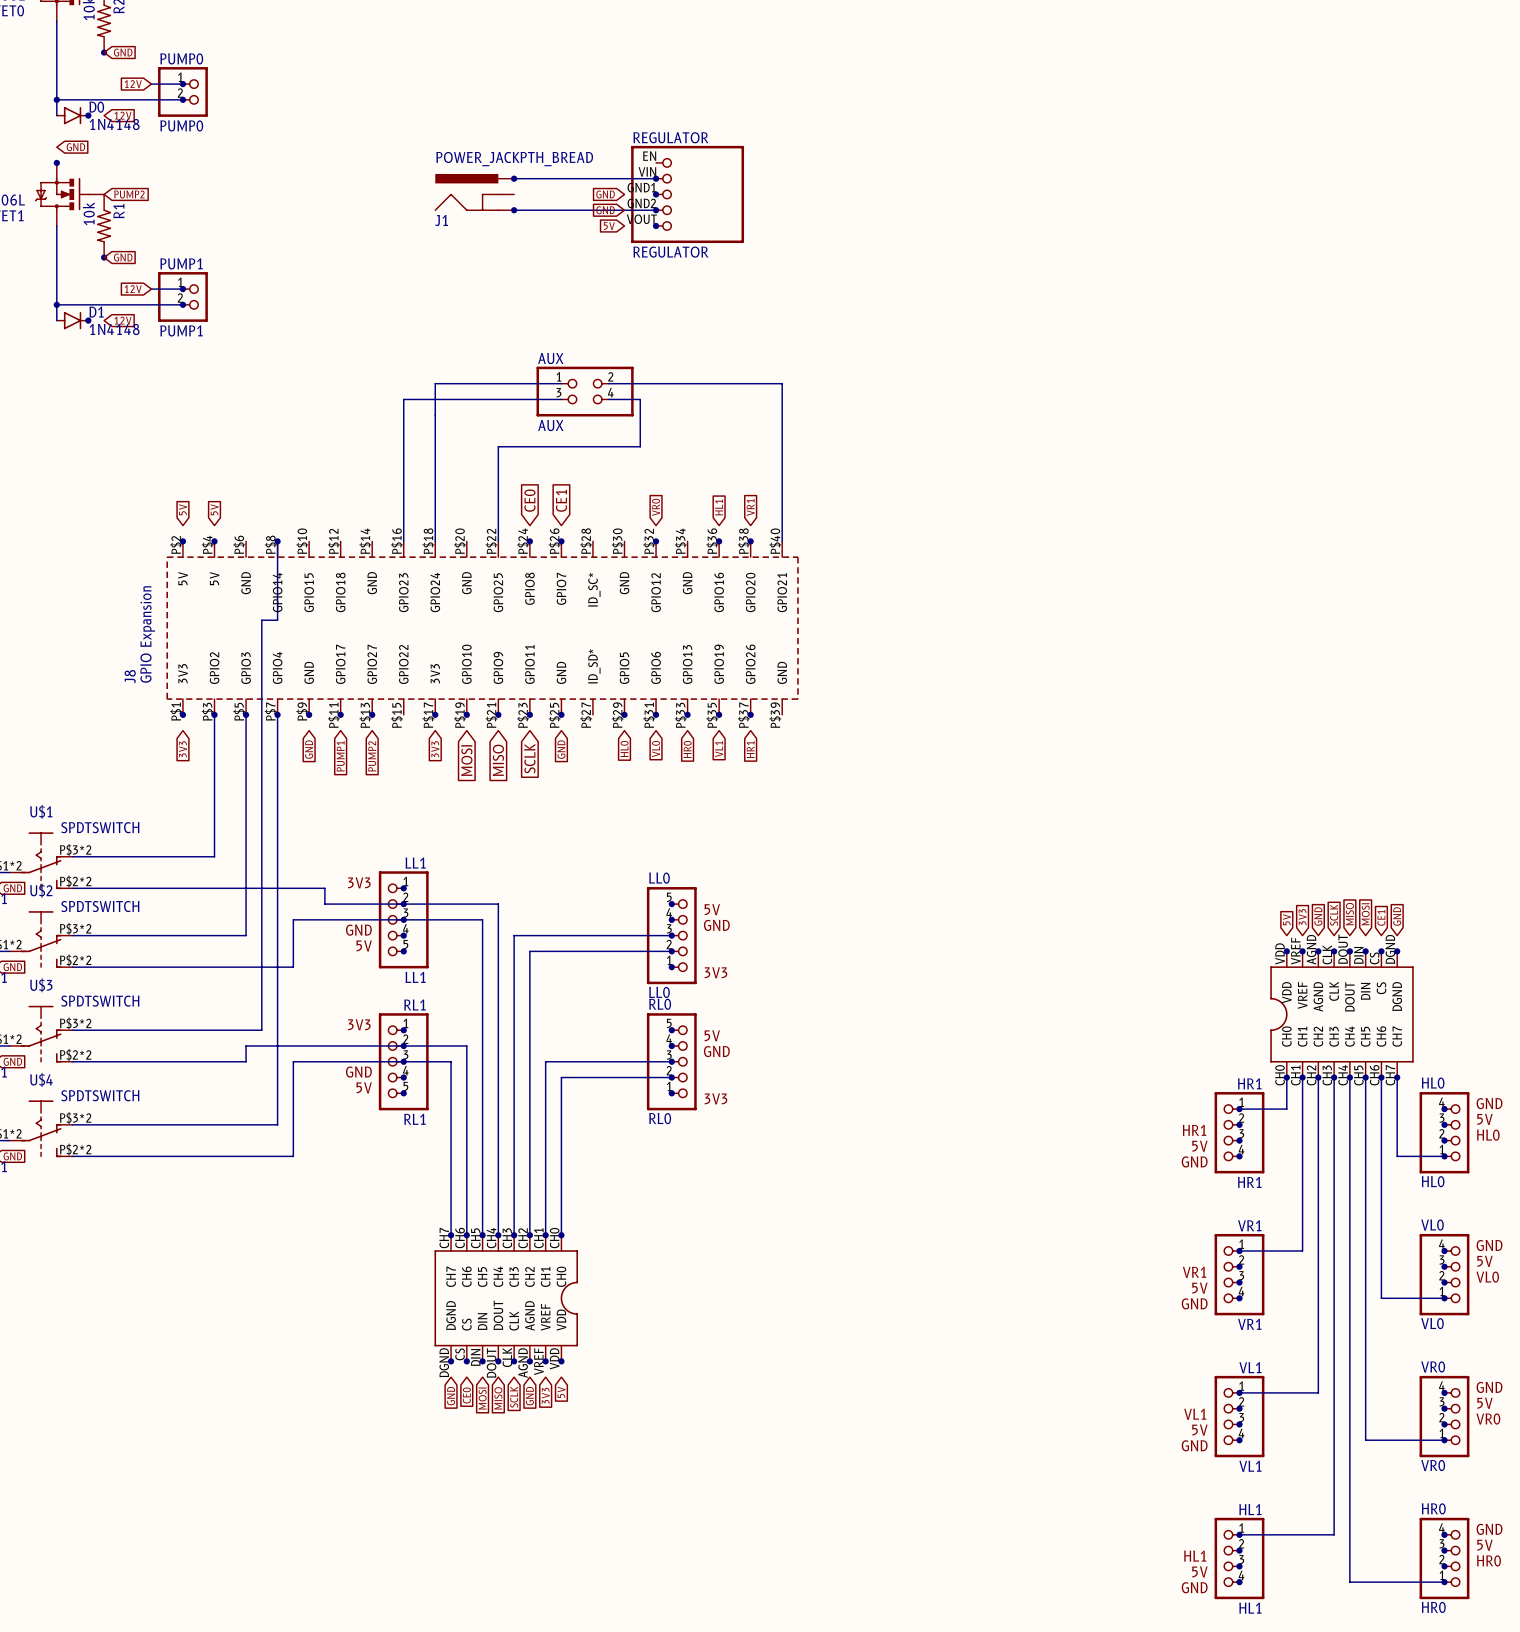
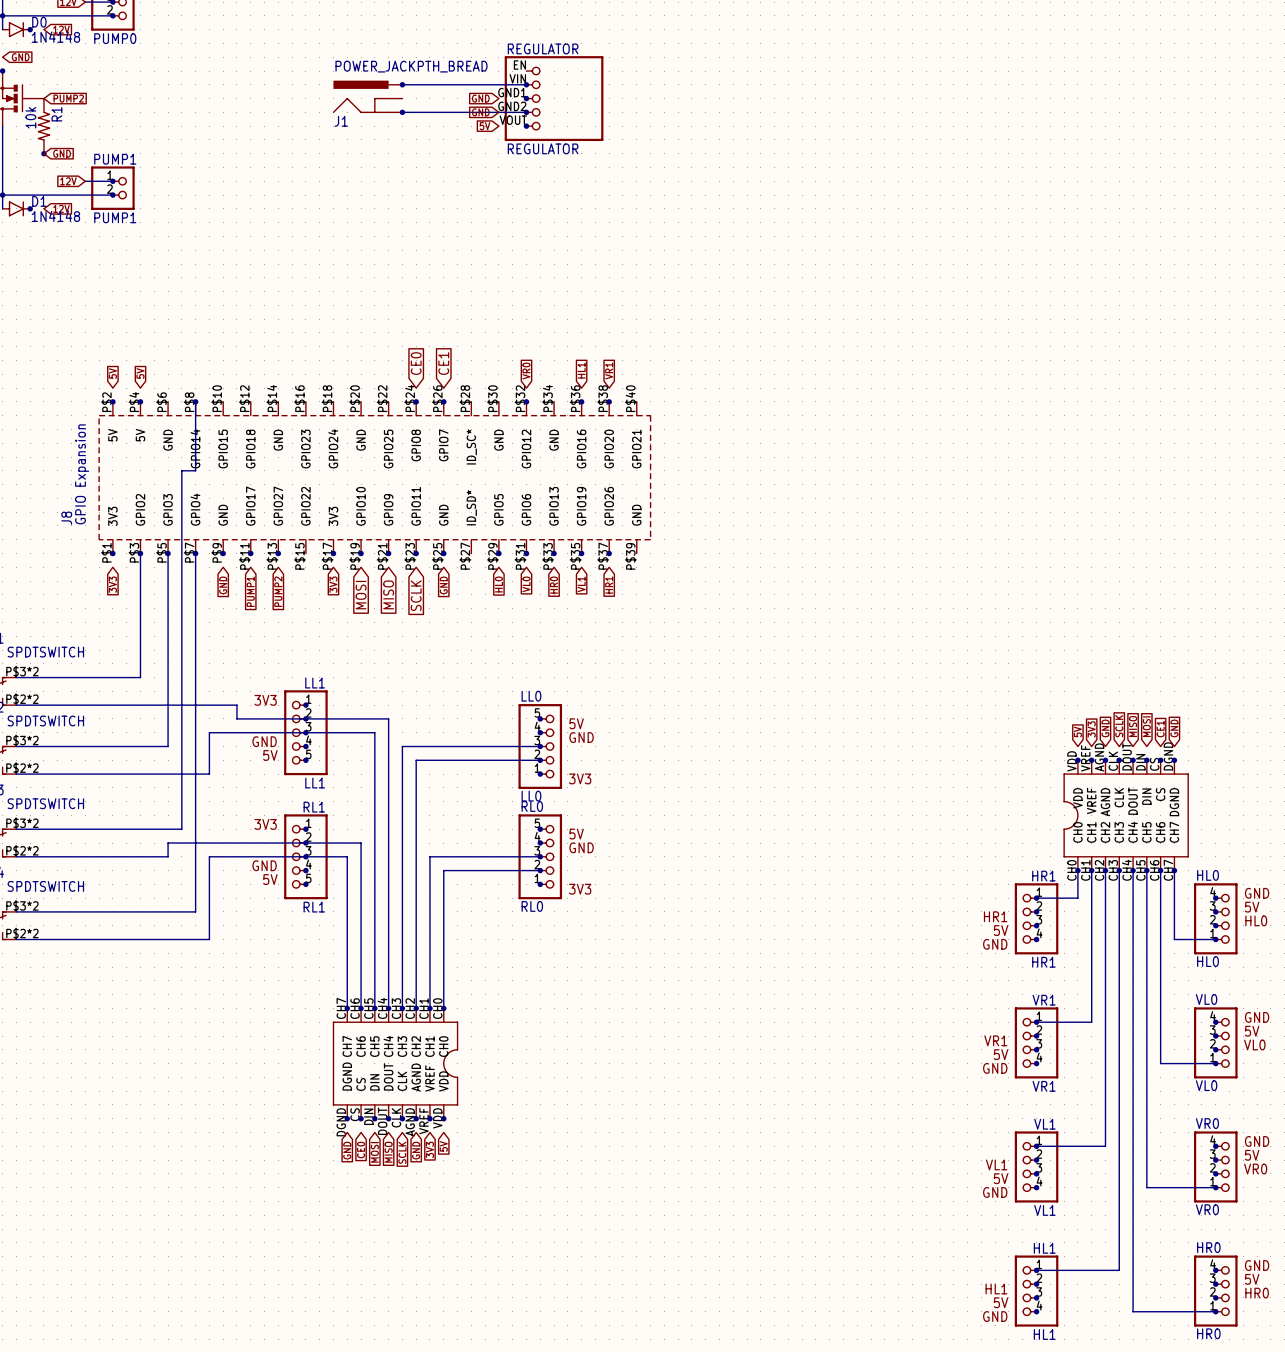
wire: (561, 383) (435, 383) (435, 541) -> none
wire: (608, 383) (782, 383) (782, 541) -> none
AUX: AUX (585, 391) -> none
wire: (561, 399) (403, 399) (403, 541) -> none
wire: (608, 399) (640, 399) (640, 446) (498, 446) (498, 541) -> none

